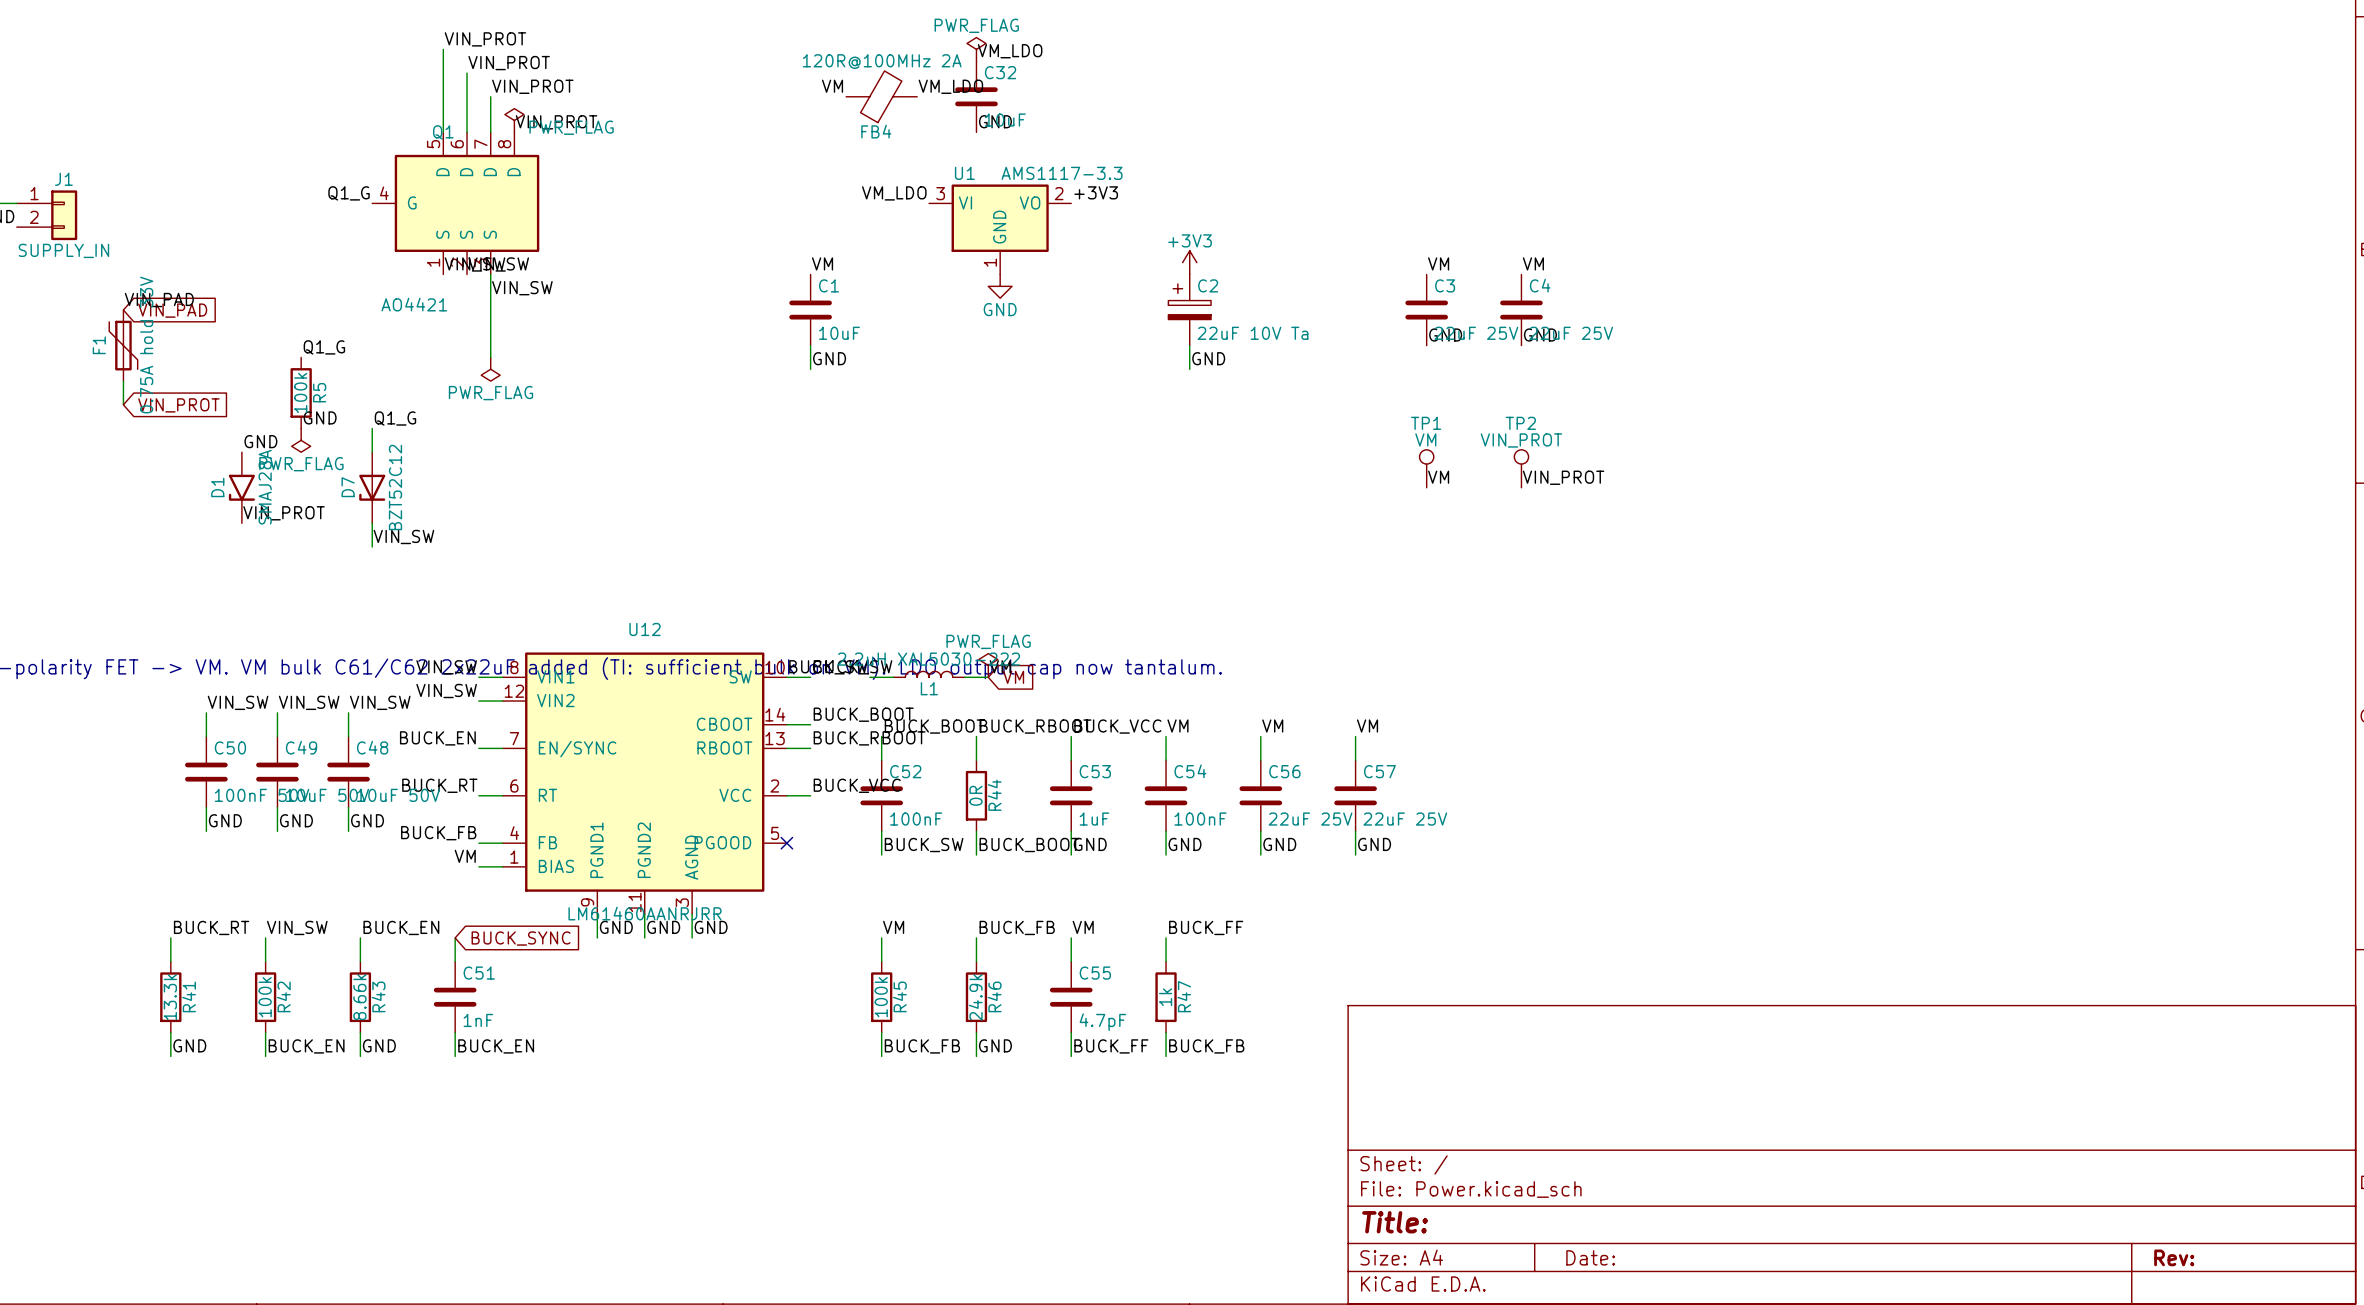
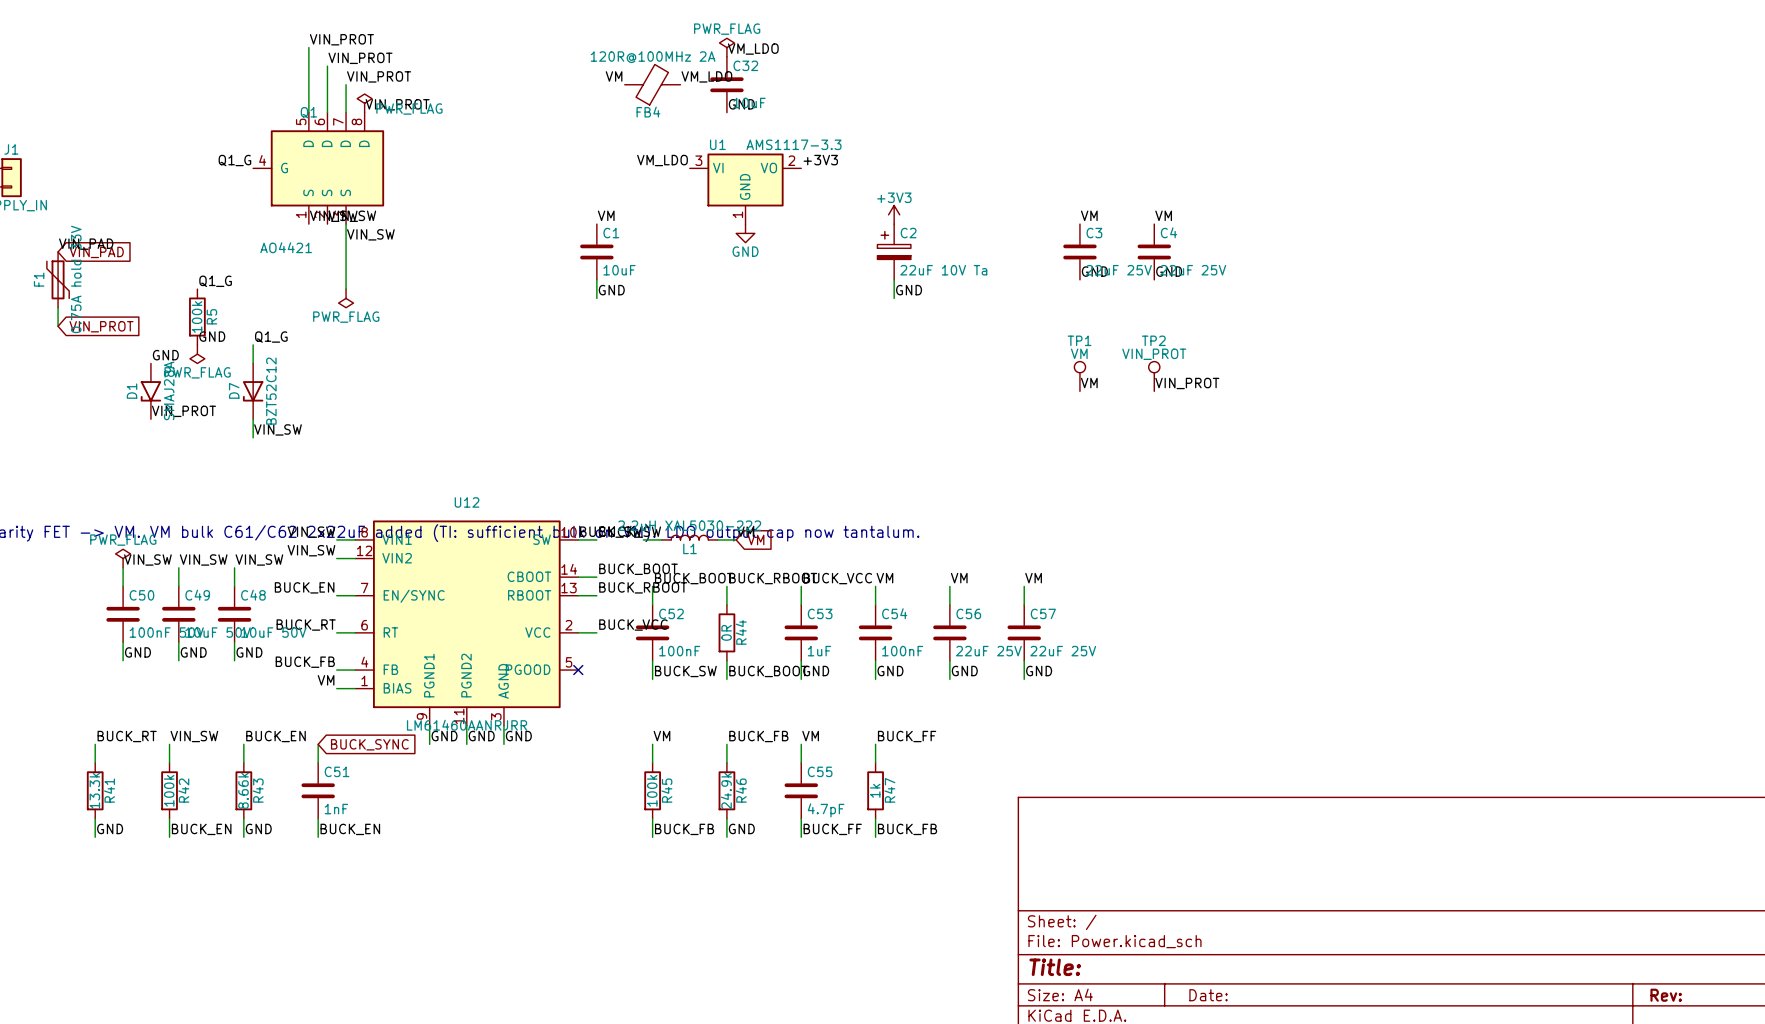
power symbol: PWR_FLAG (988, 665) -> none
power symbol: none -> PWR_FLAG (123, 558)

